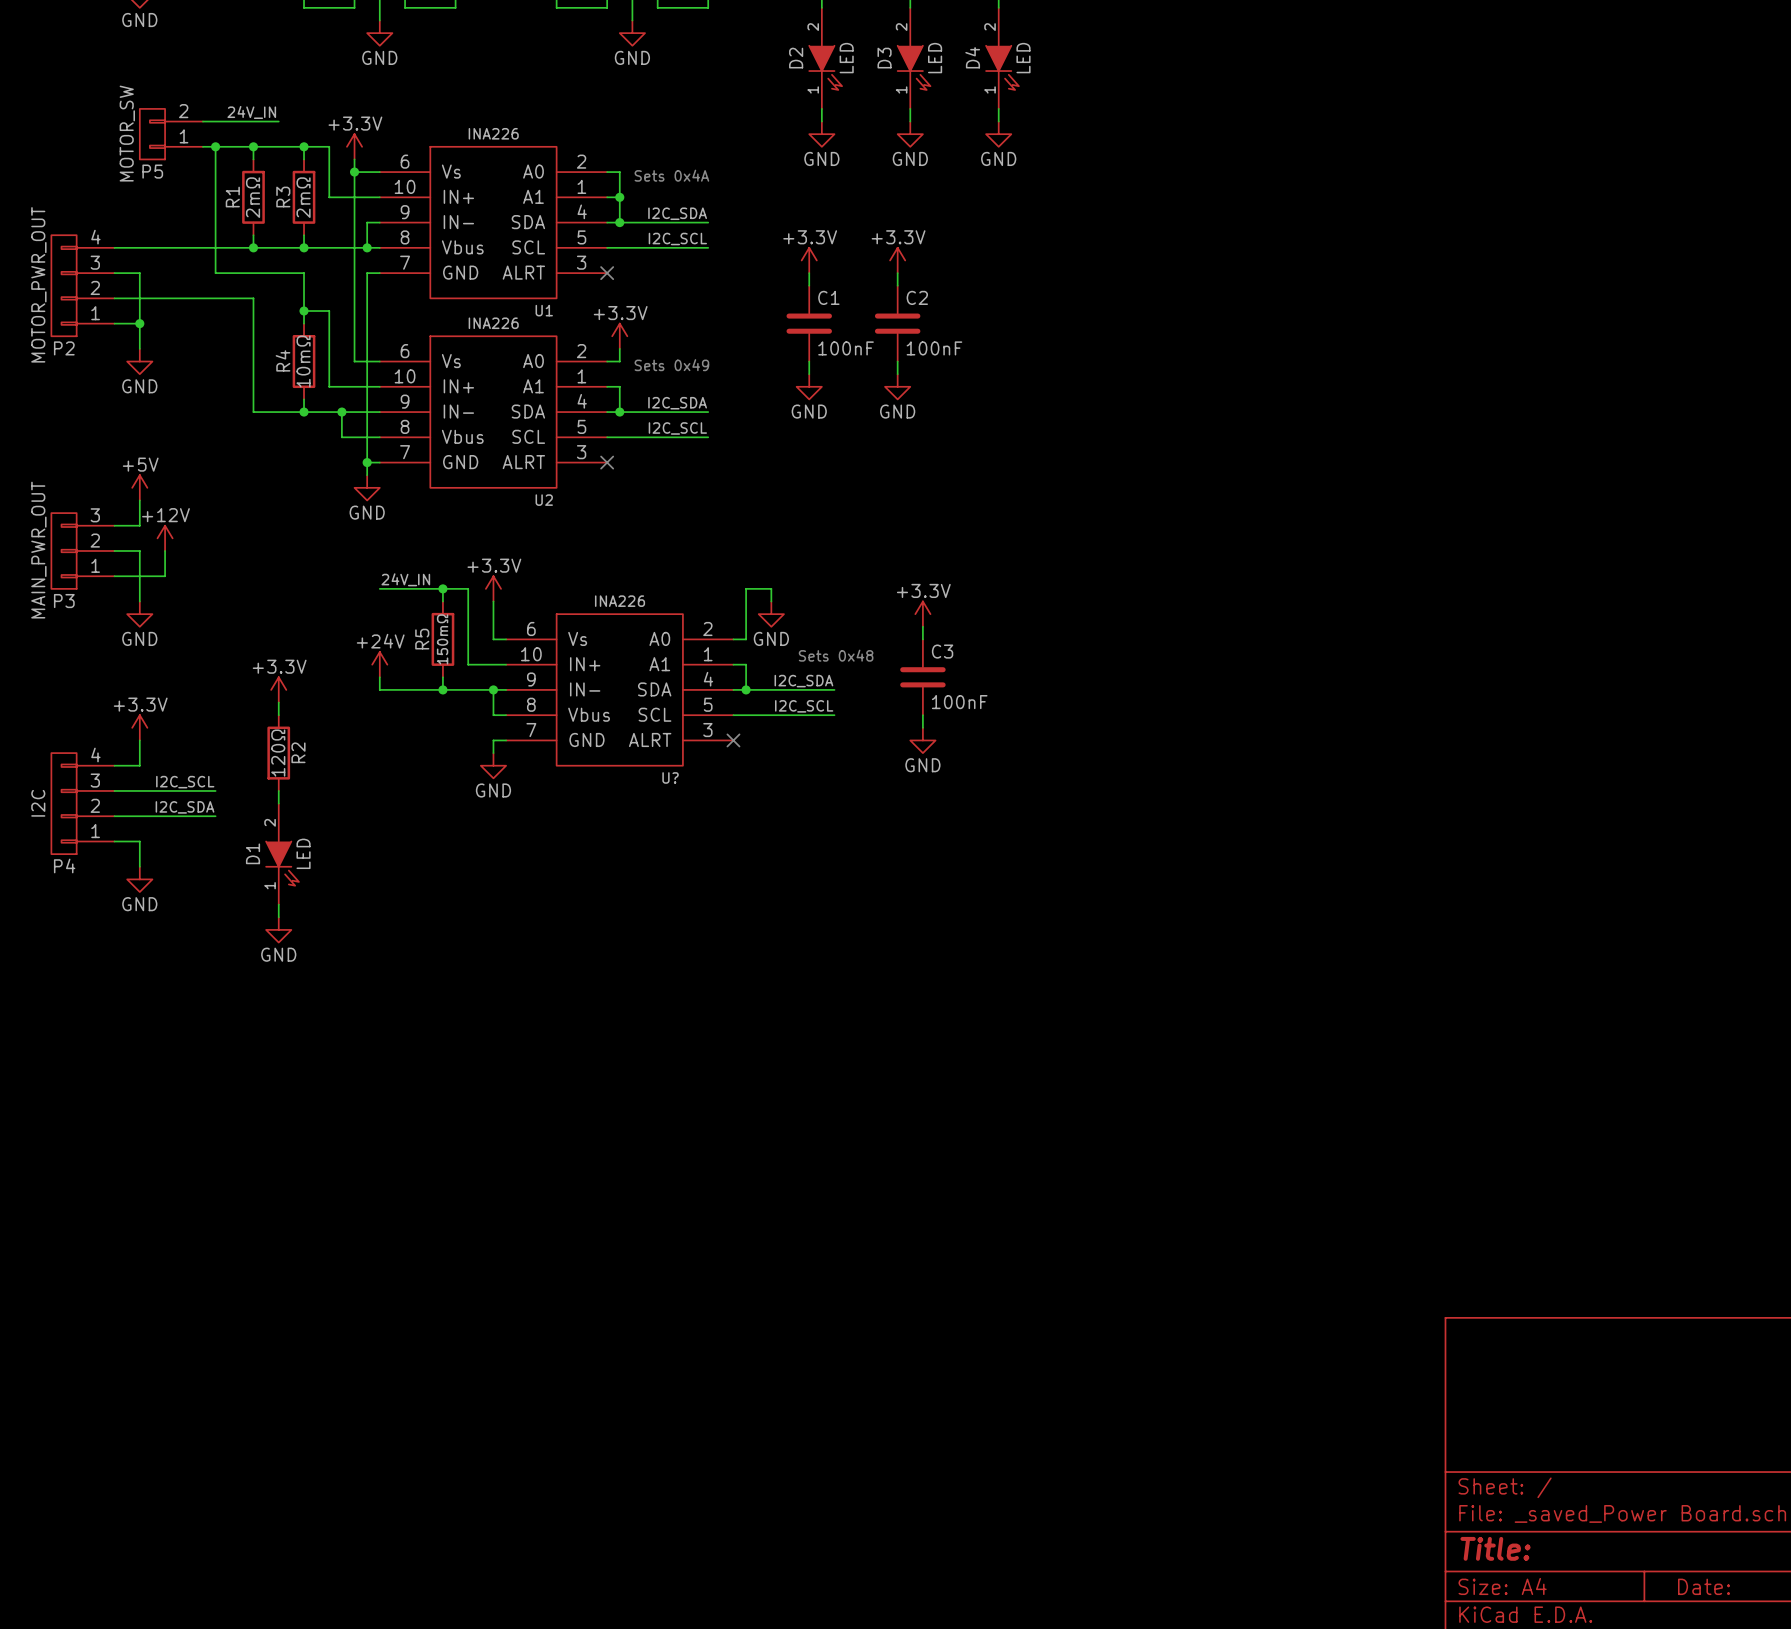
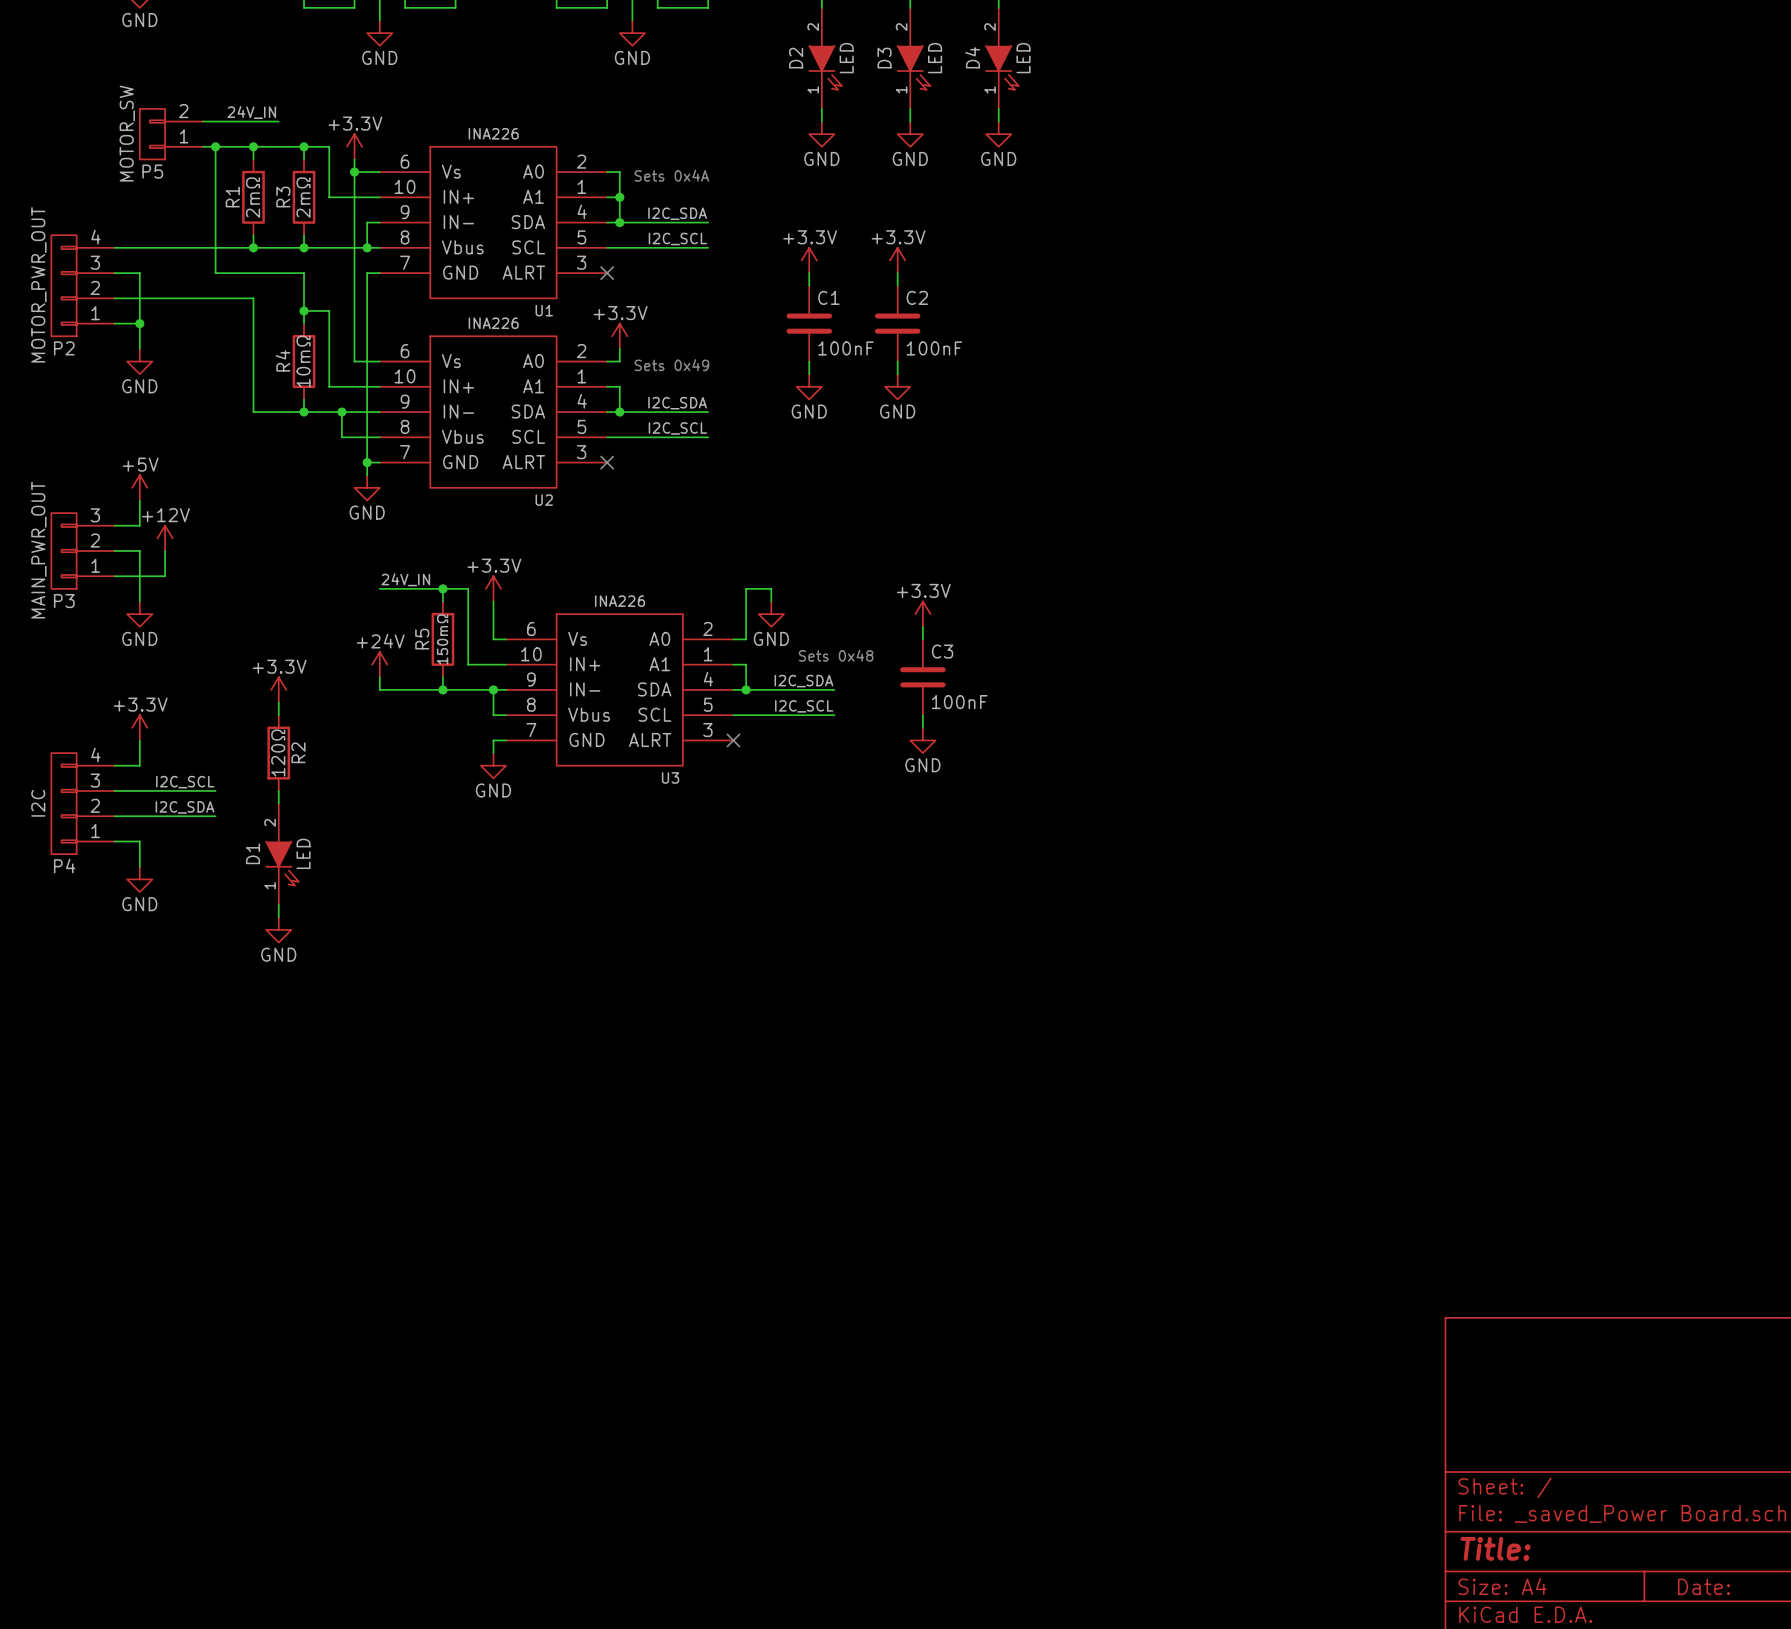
U? name: U? (670, 777) -> U3 (670, 777)

